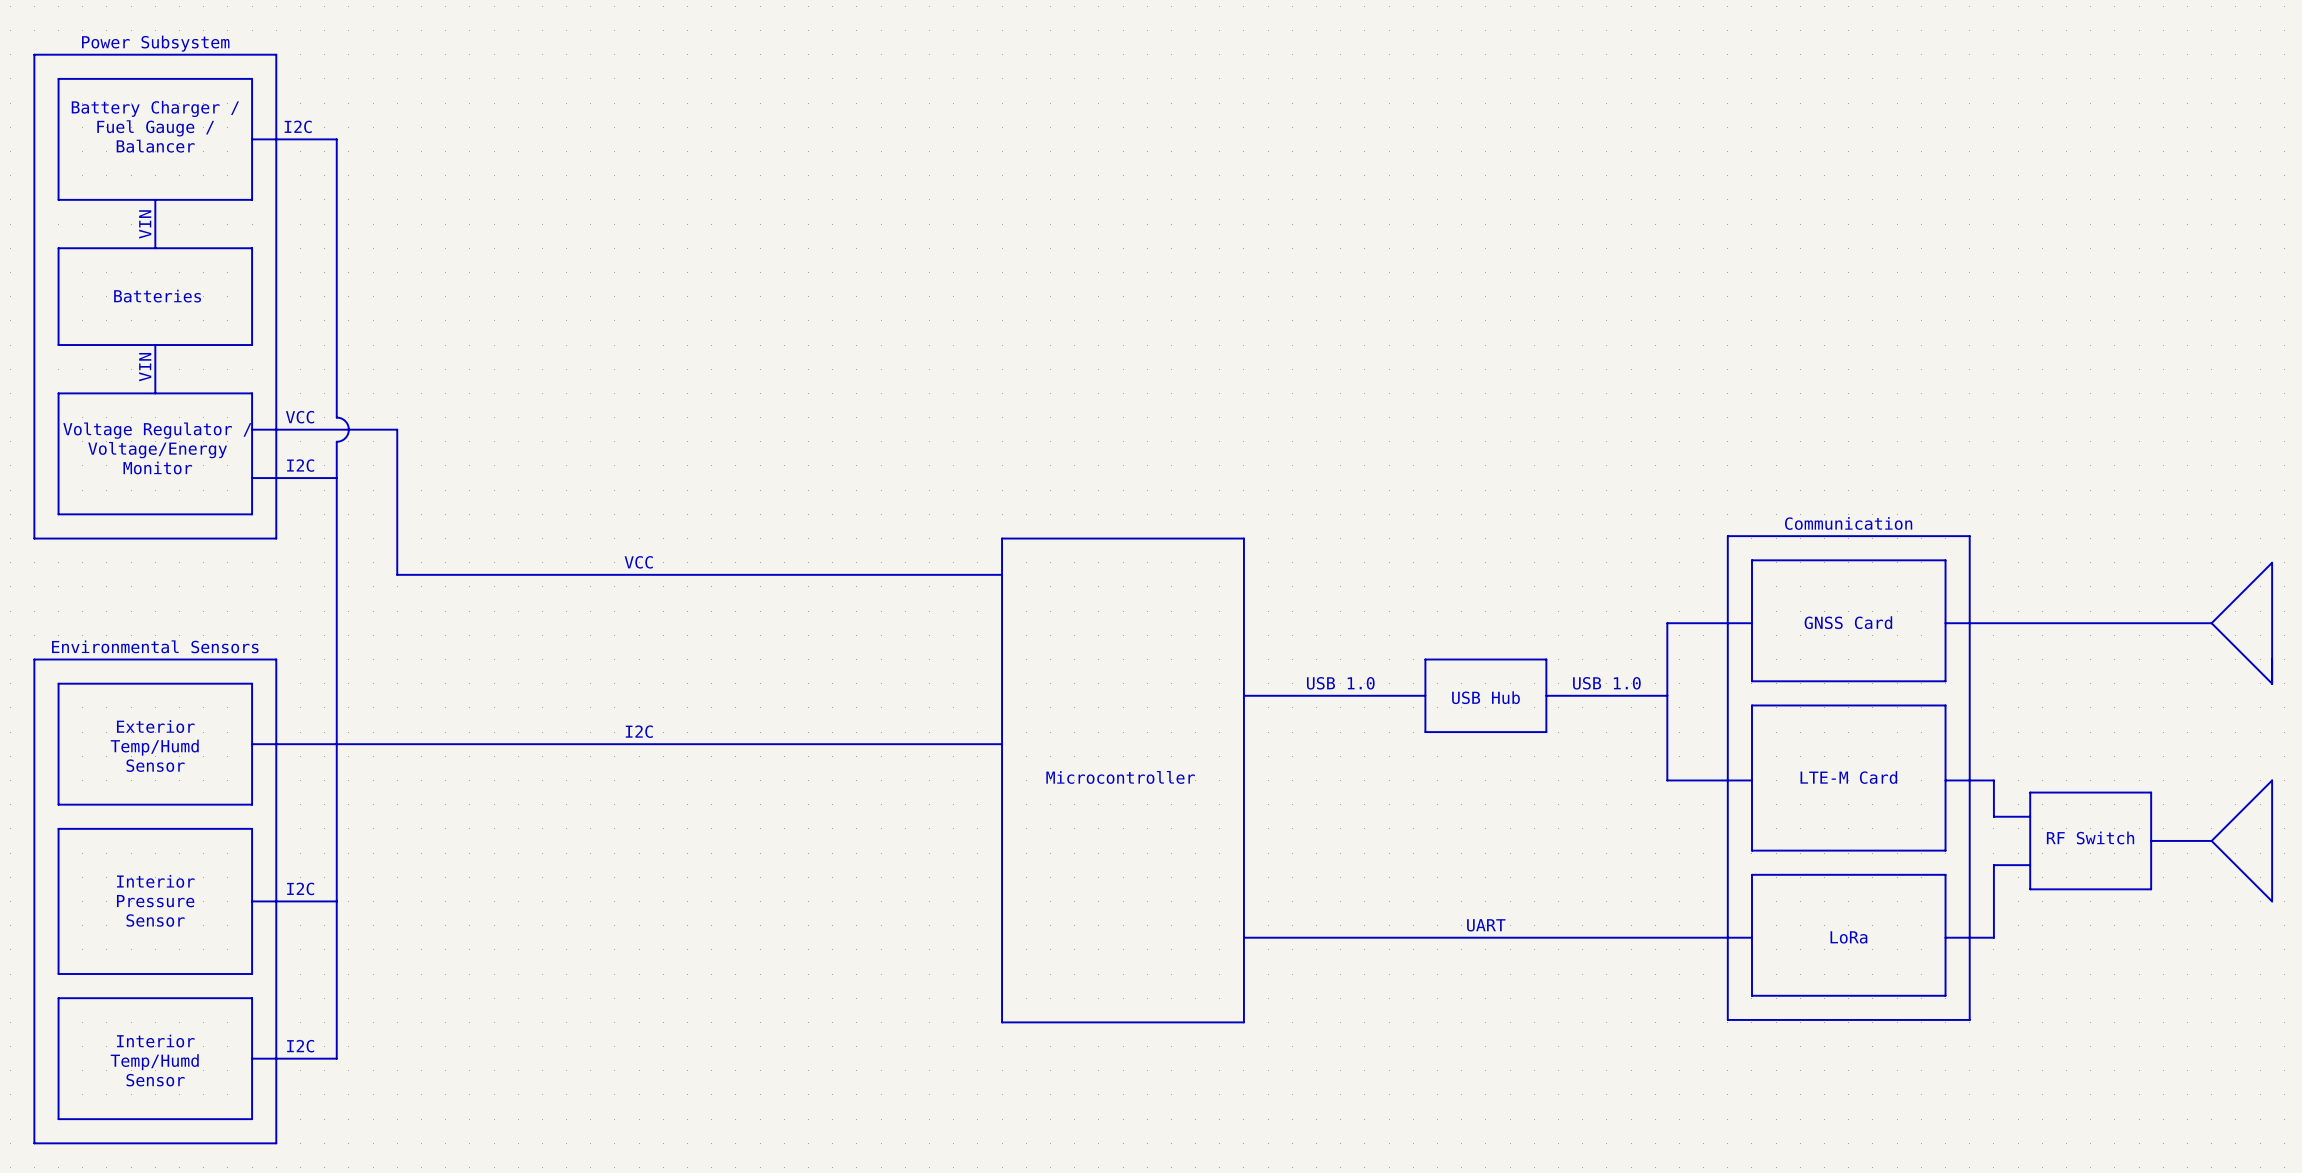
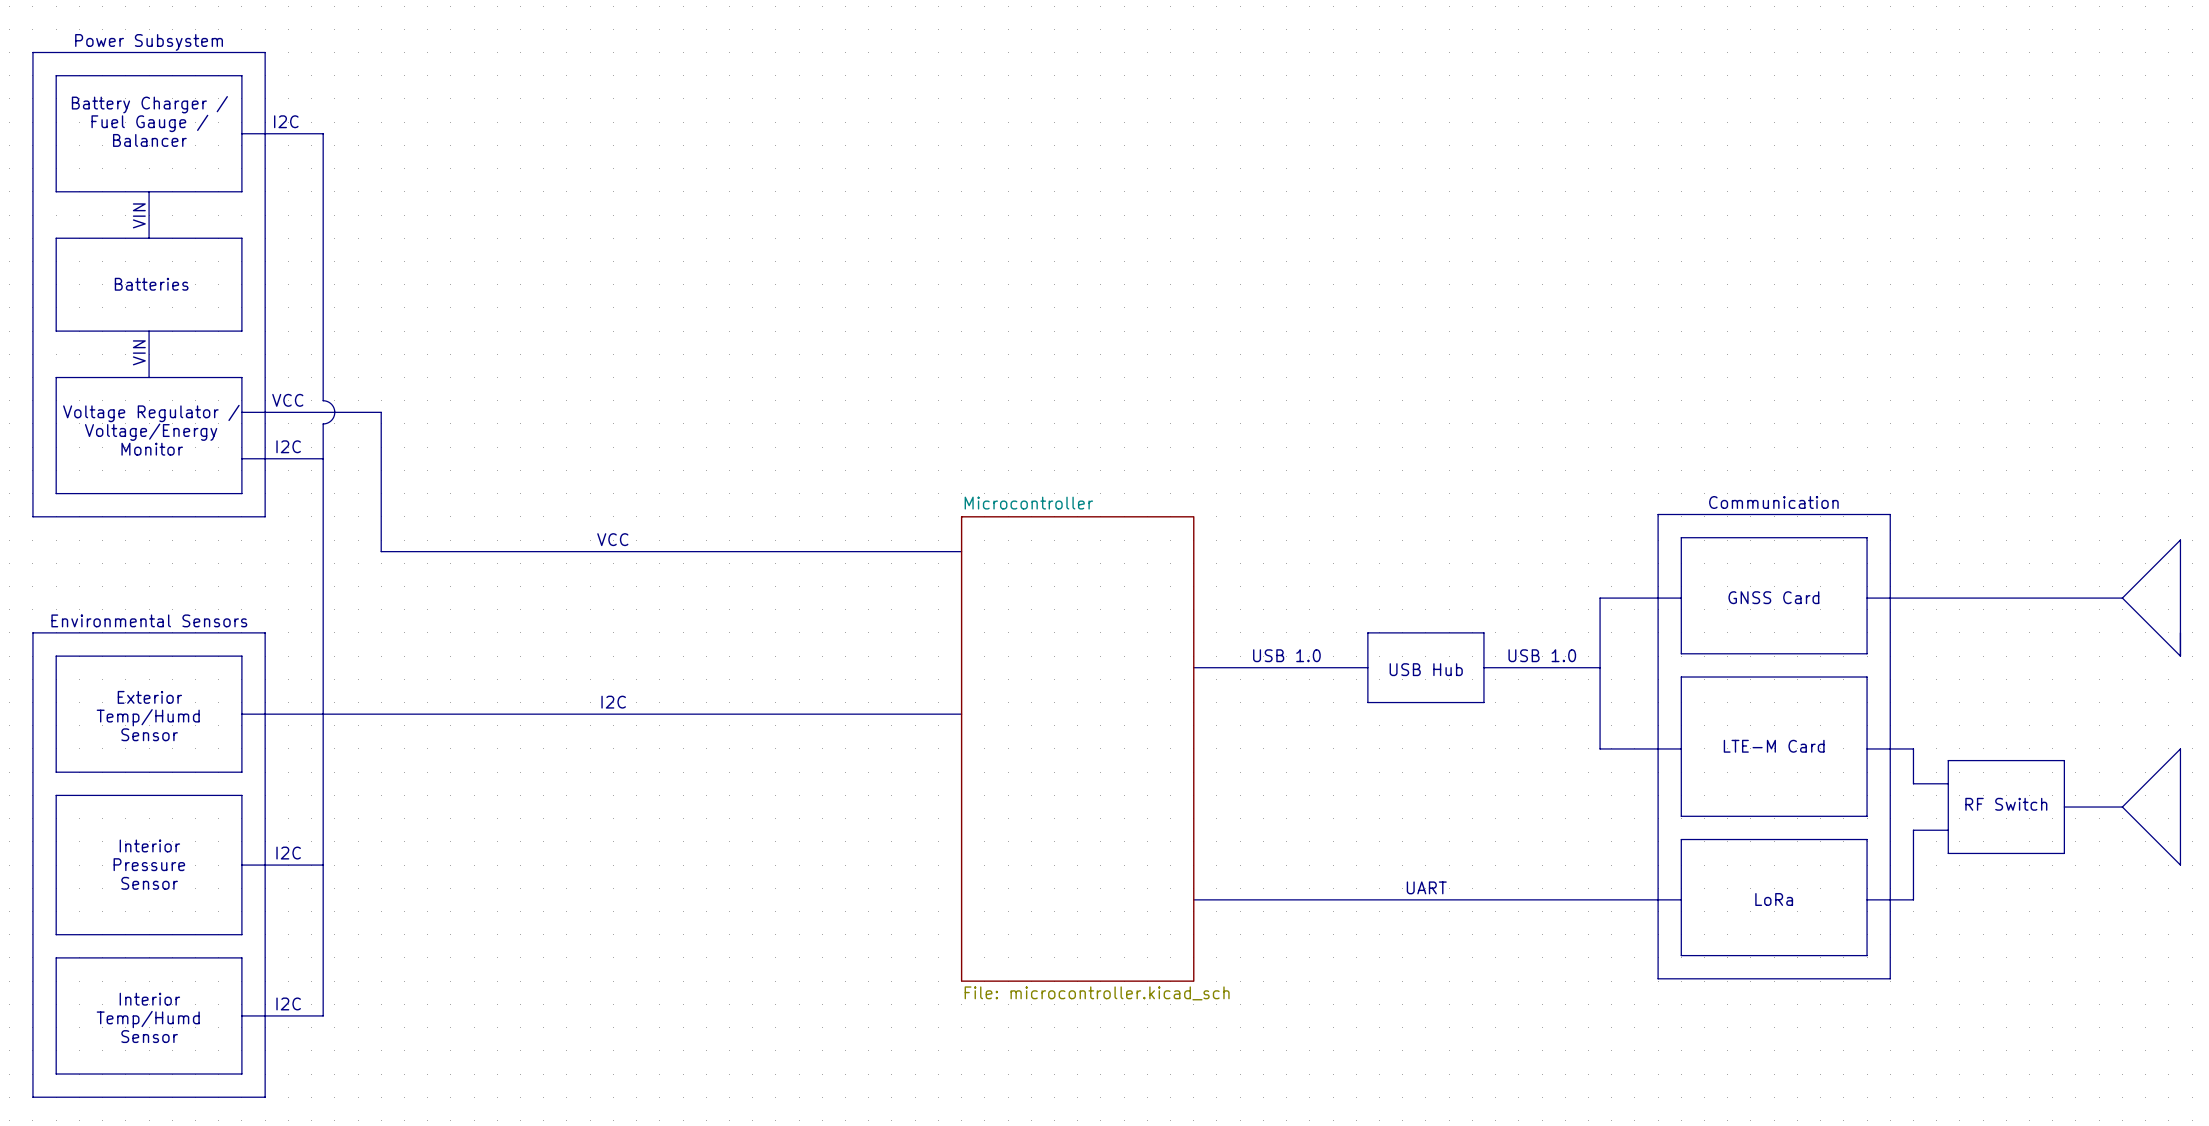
line: (1002, 538) (1243, 538) (1243, 1022) (1002, 1022) (1002, 538) -> none
text: Microcontroller (1120, 777) -> none
sheet Microcontroller: none -> File: microcontroller.kicad_sch (1077, 748)

